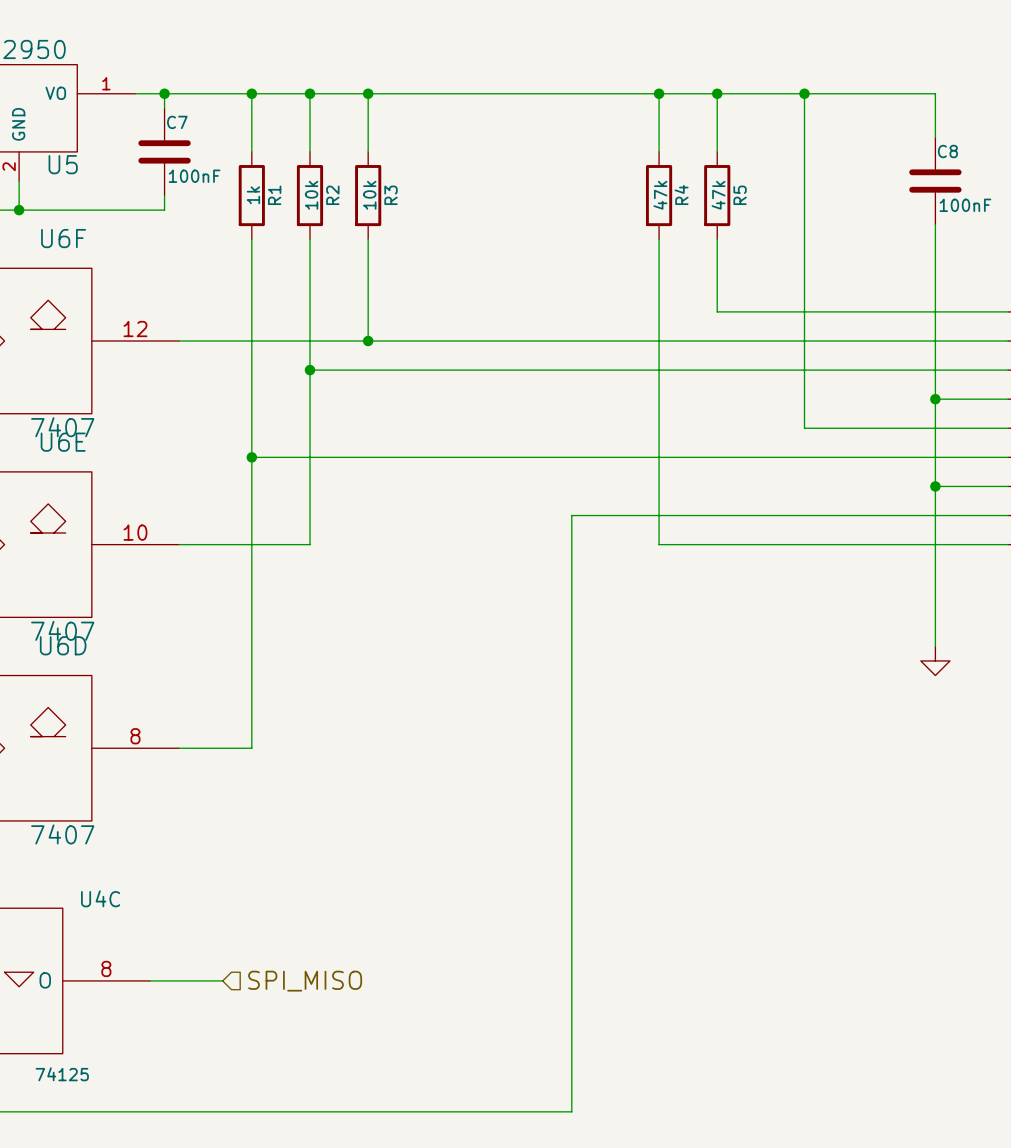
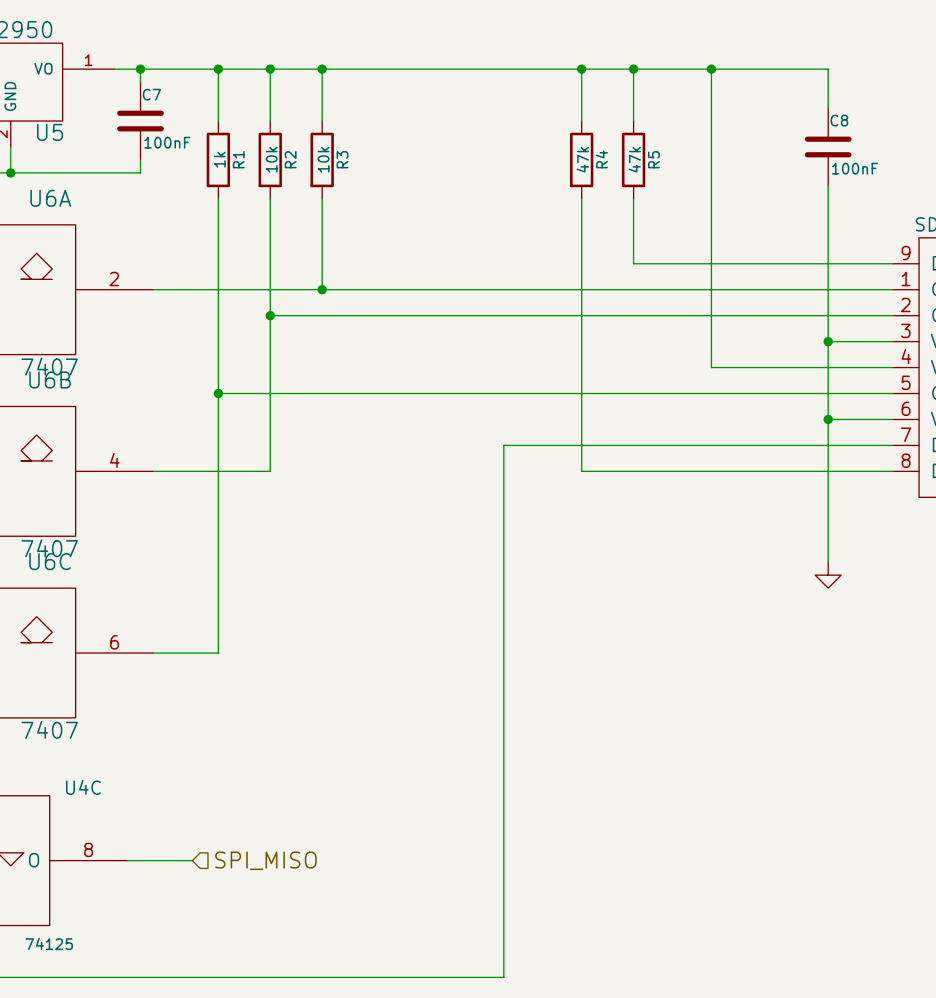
U6F name: U6F (63, 238) -> U6A (50, 198)
U6F pin number: 12 (135, 329) -> 2 (114, 279)
U6E name: U6E (63, 442) -> U6B (50, 379)
U6E pin number: 10 (135, 532) -> 4 (114, 460)
U6D name: U6D (63, 645) -> U6C (50, 561)
U6D pin number: 8 (135, 736) -> 6 (114, 642)

